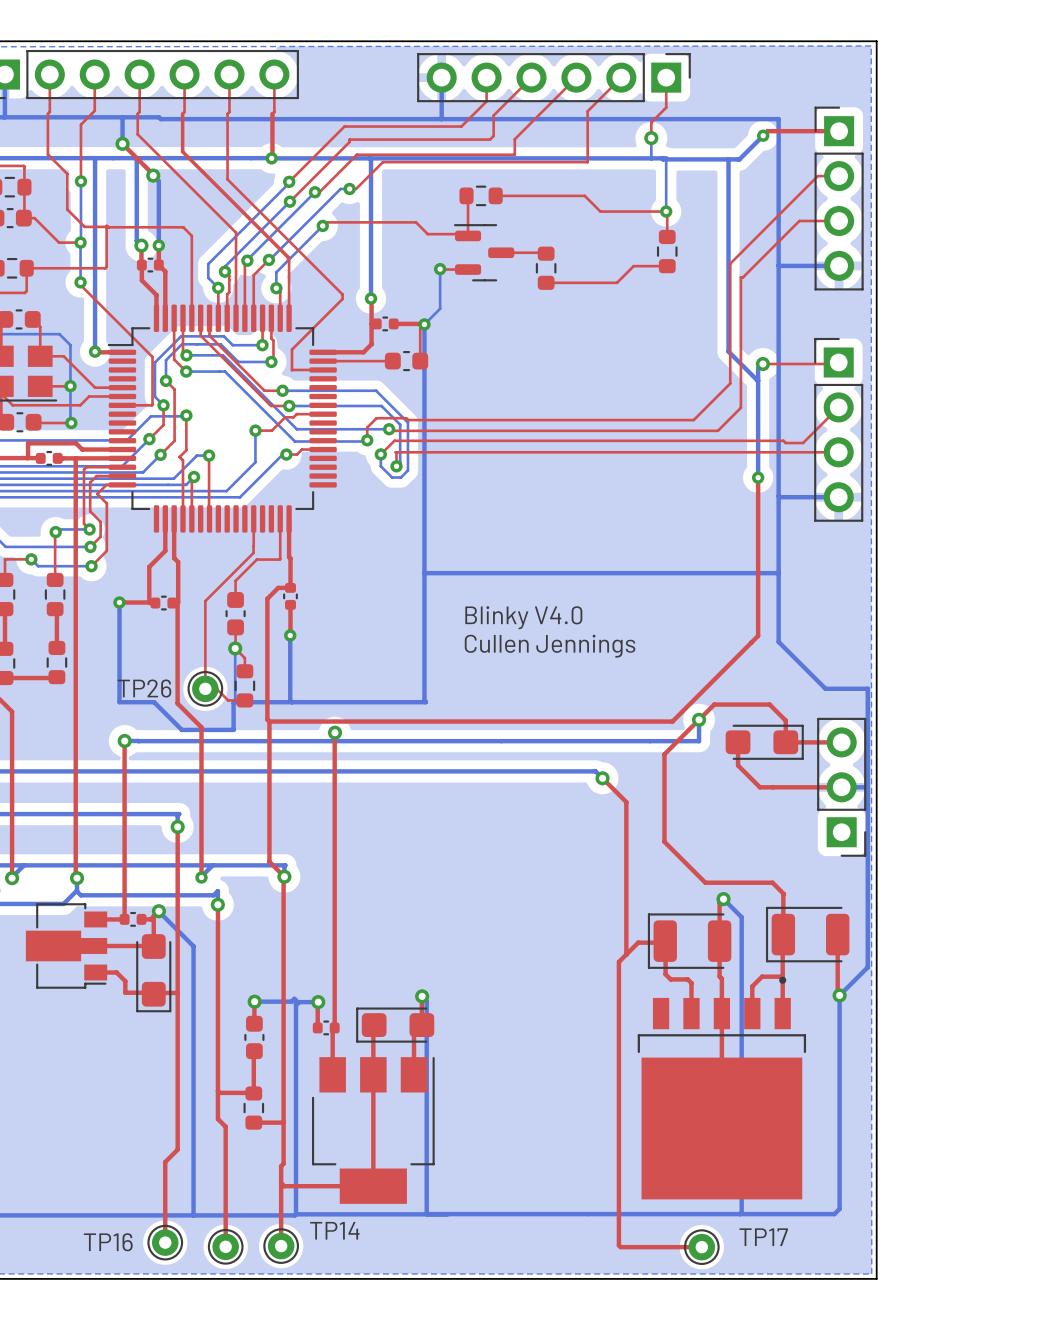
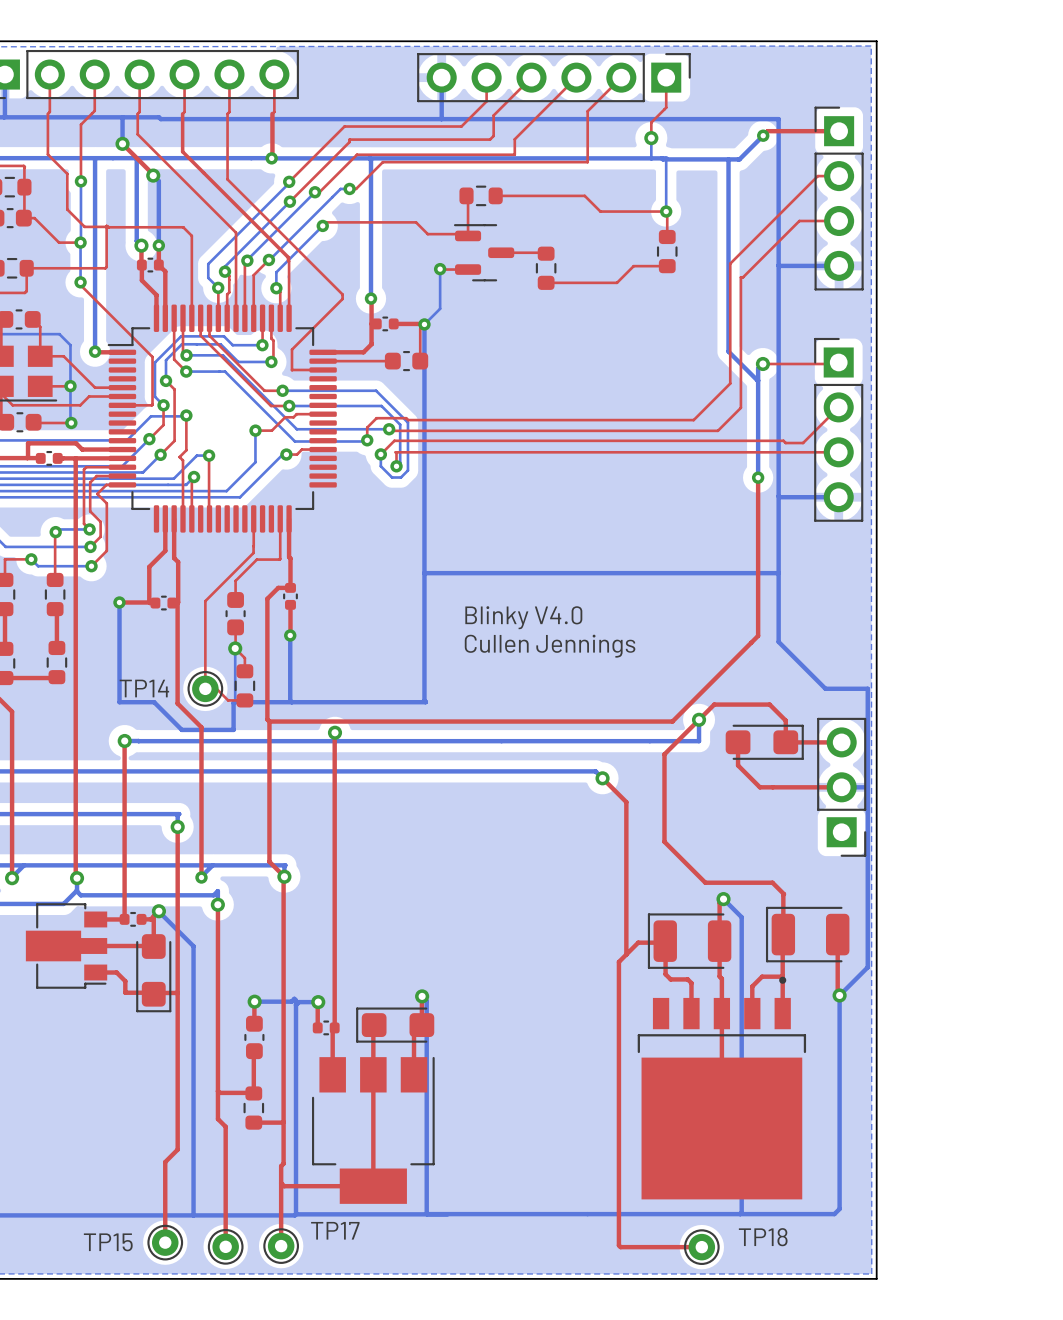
TP26 name: TP26 (144, 688) -> TP14 (144, 688)
TP14 name: TP14 (334, 1230) -> TP17 (335, 1230)
TP17 name: TP17 (763, 1237) -> TP18 (763, 1237)
TP16 name: TP16 (108, 1242) -> TP15 (108, 1242)

